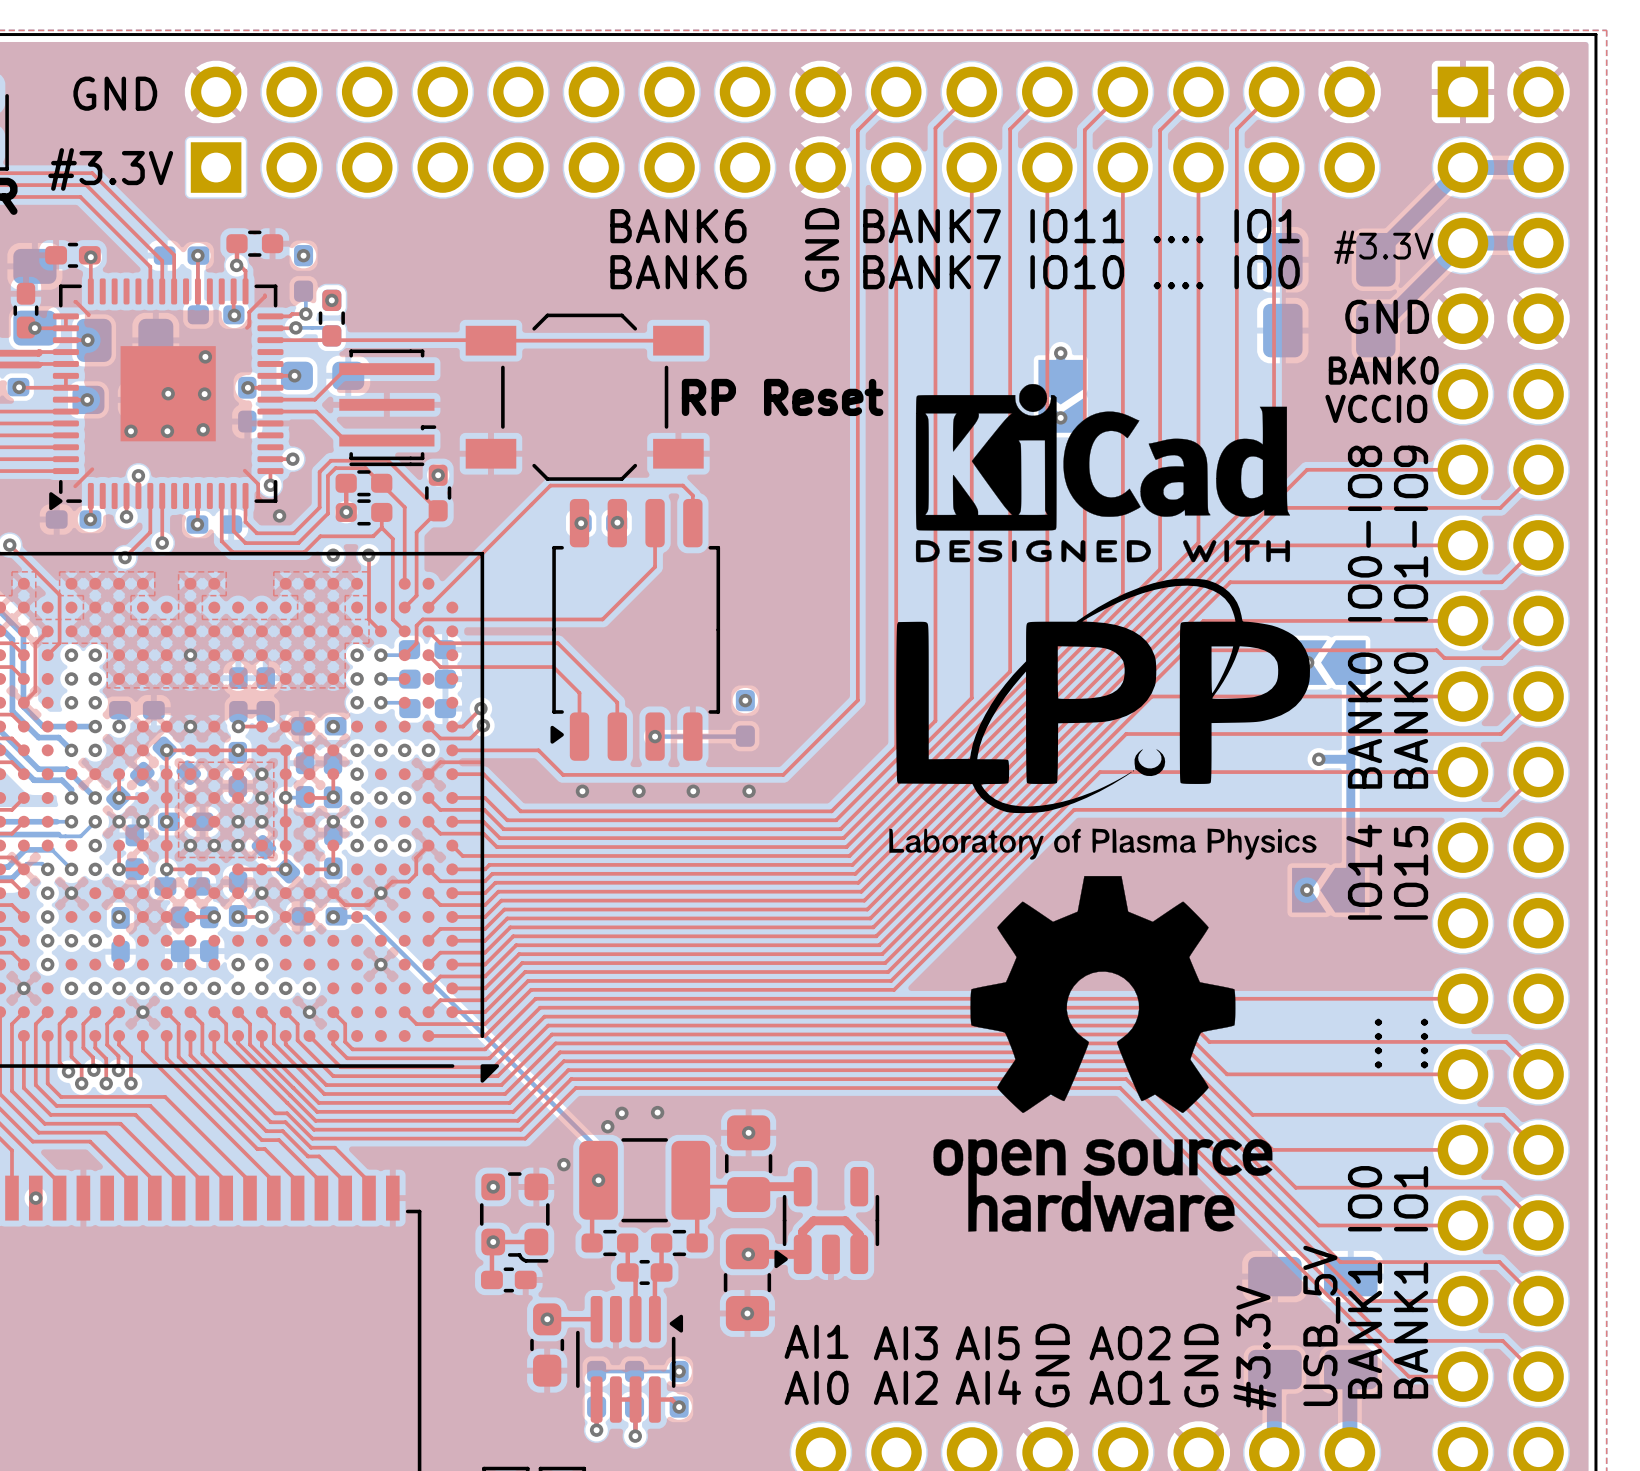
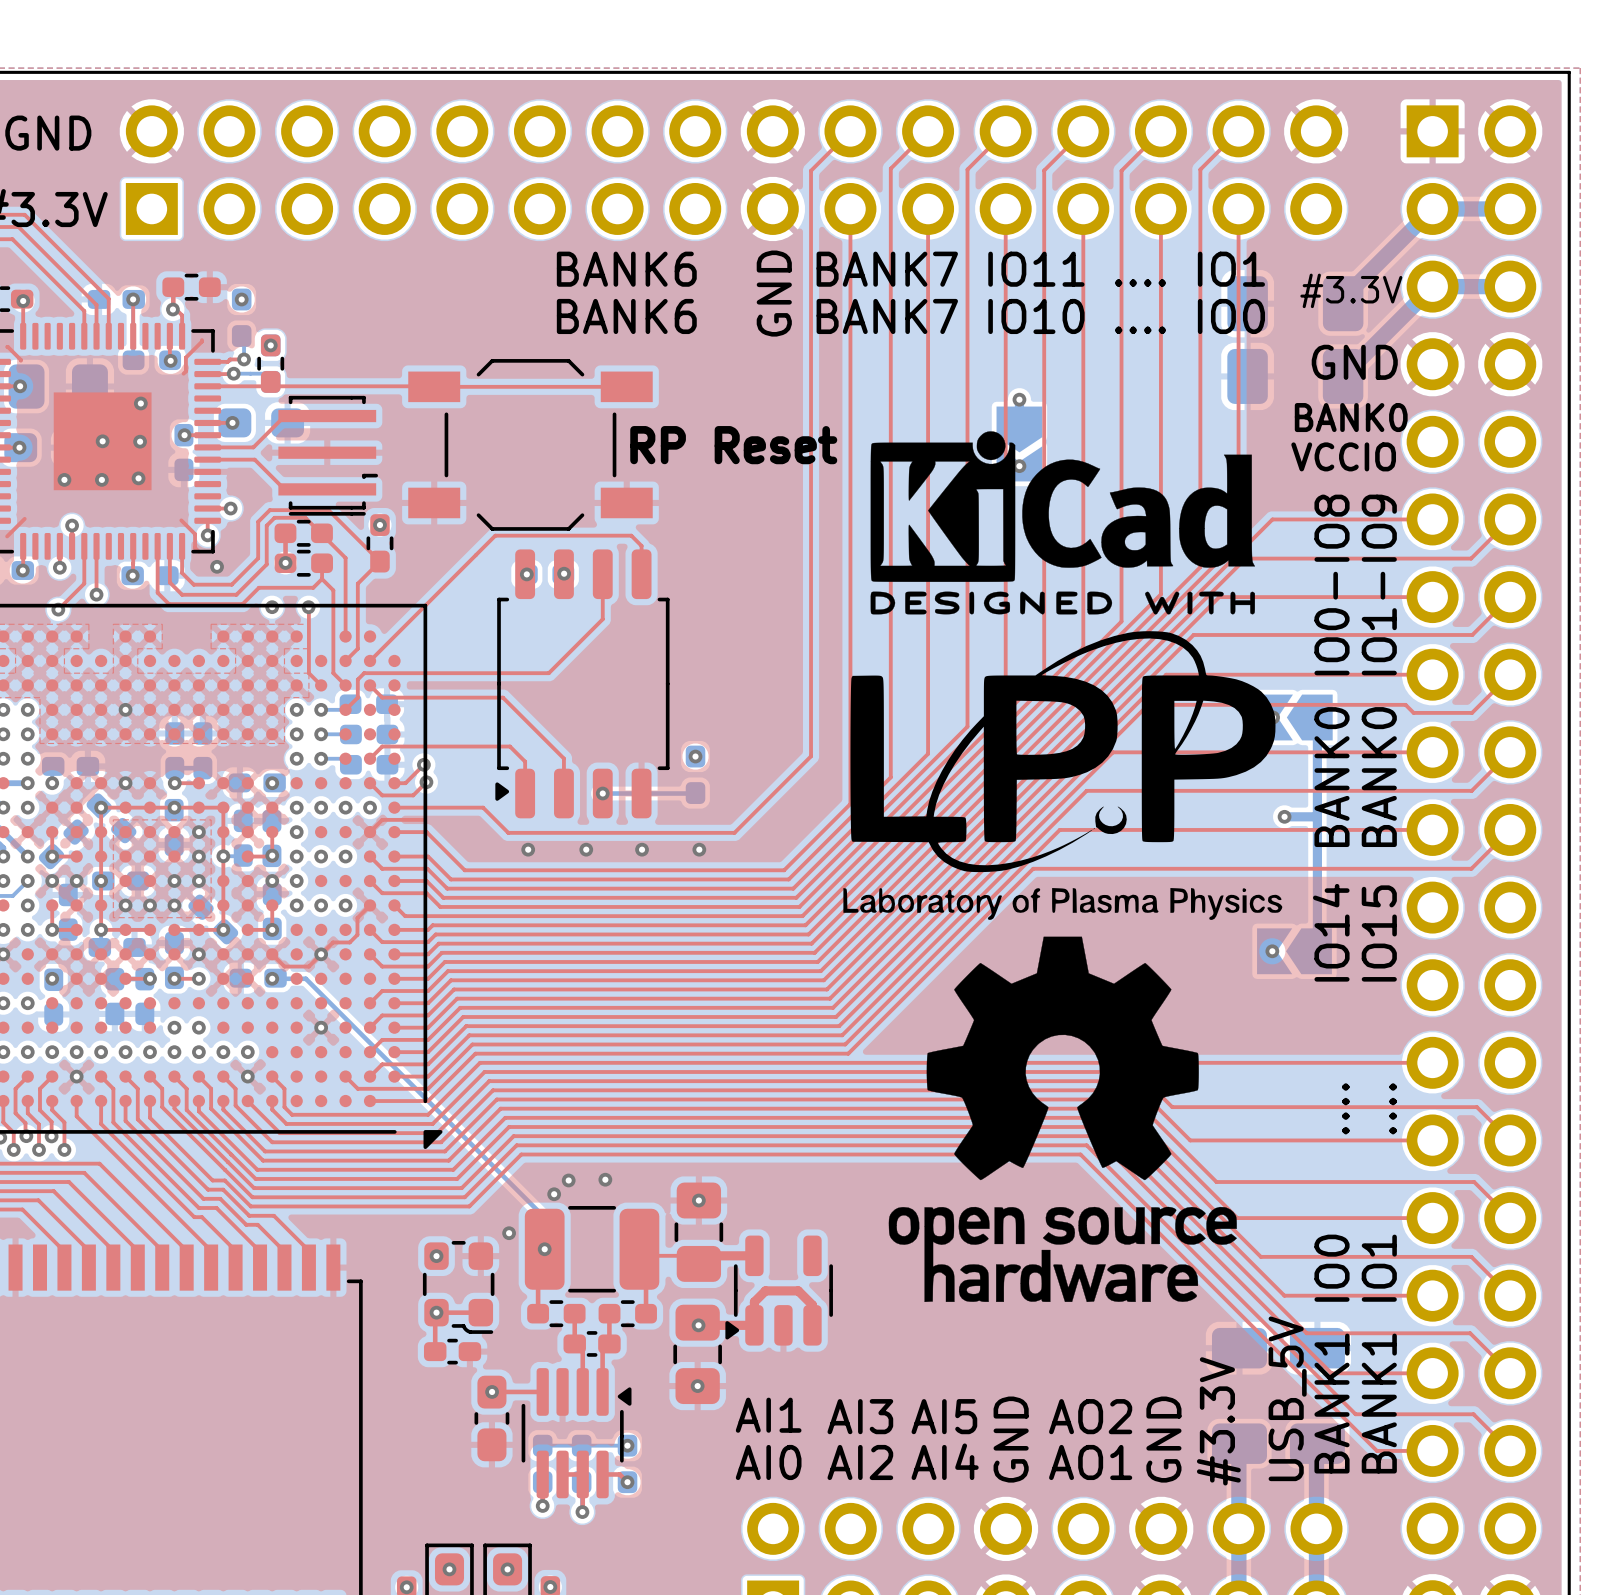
top track: (428, 655) (440, 667) (553, 667) (579, 693) (579, 705) -> (370, 758) (382, 746) (510, 746) (525, 761)

